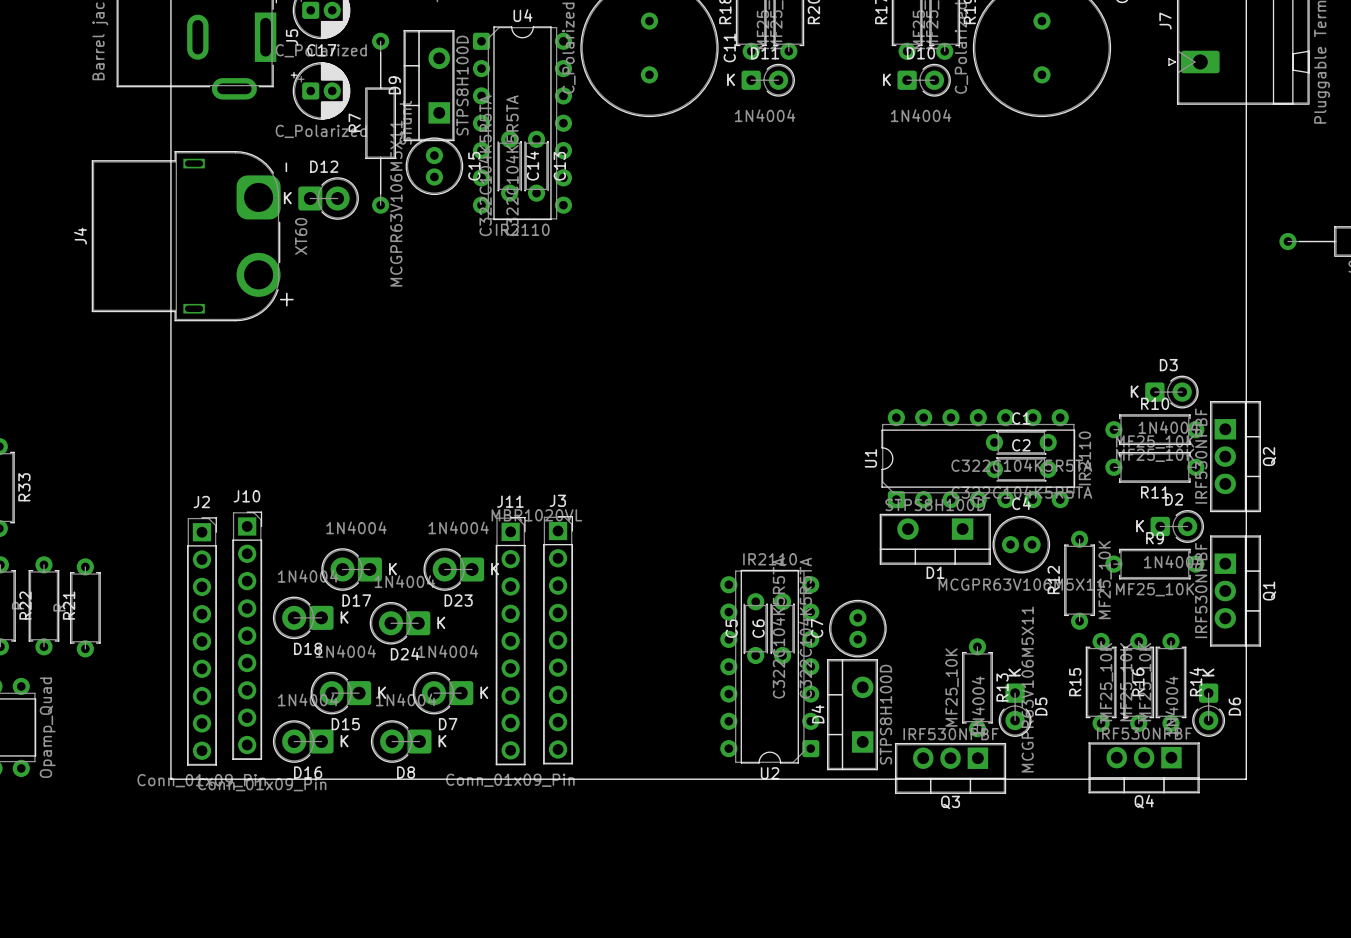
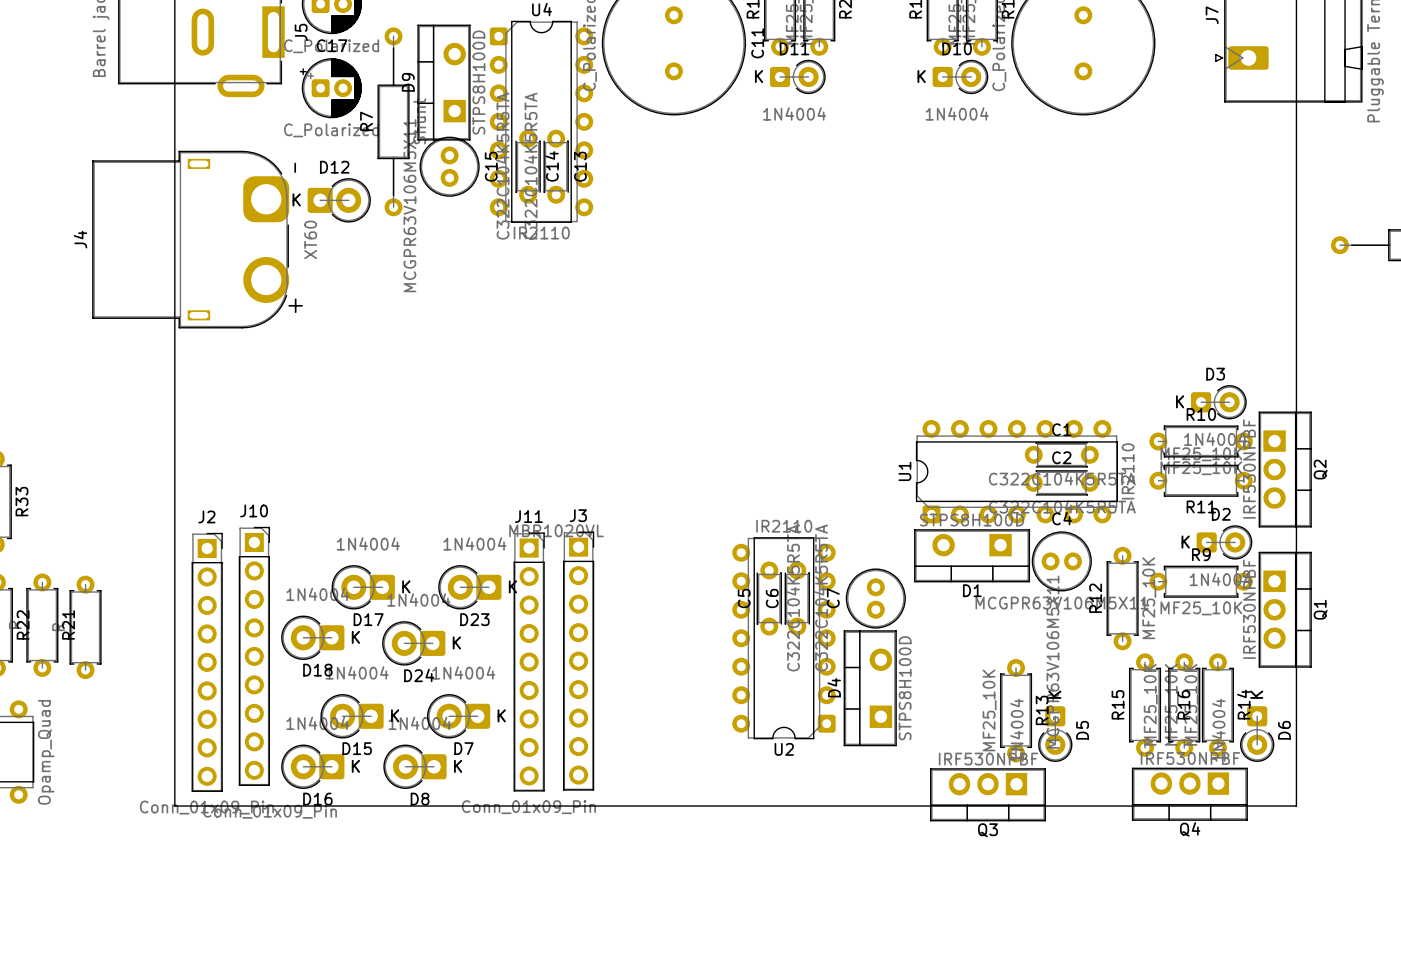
C5 position: (755, 628) -> (769, 598)
C6 position: (782, 628) -> (797, 598)
C7 position: (857, 628) -> (875, 598)
U2 position: (769, 666) -> (783, 638)
D4 position: (852, 714) -> (870, 688)

